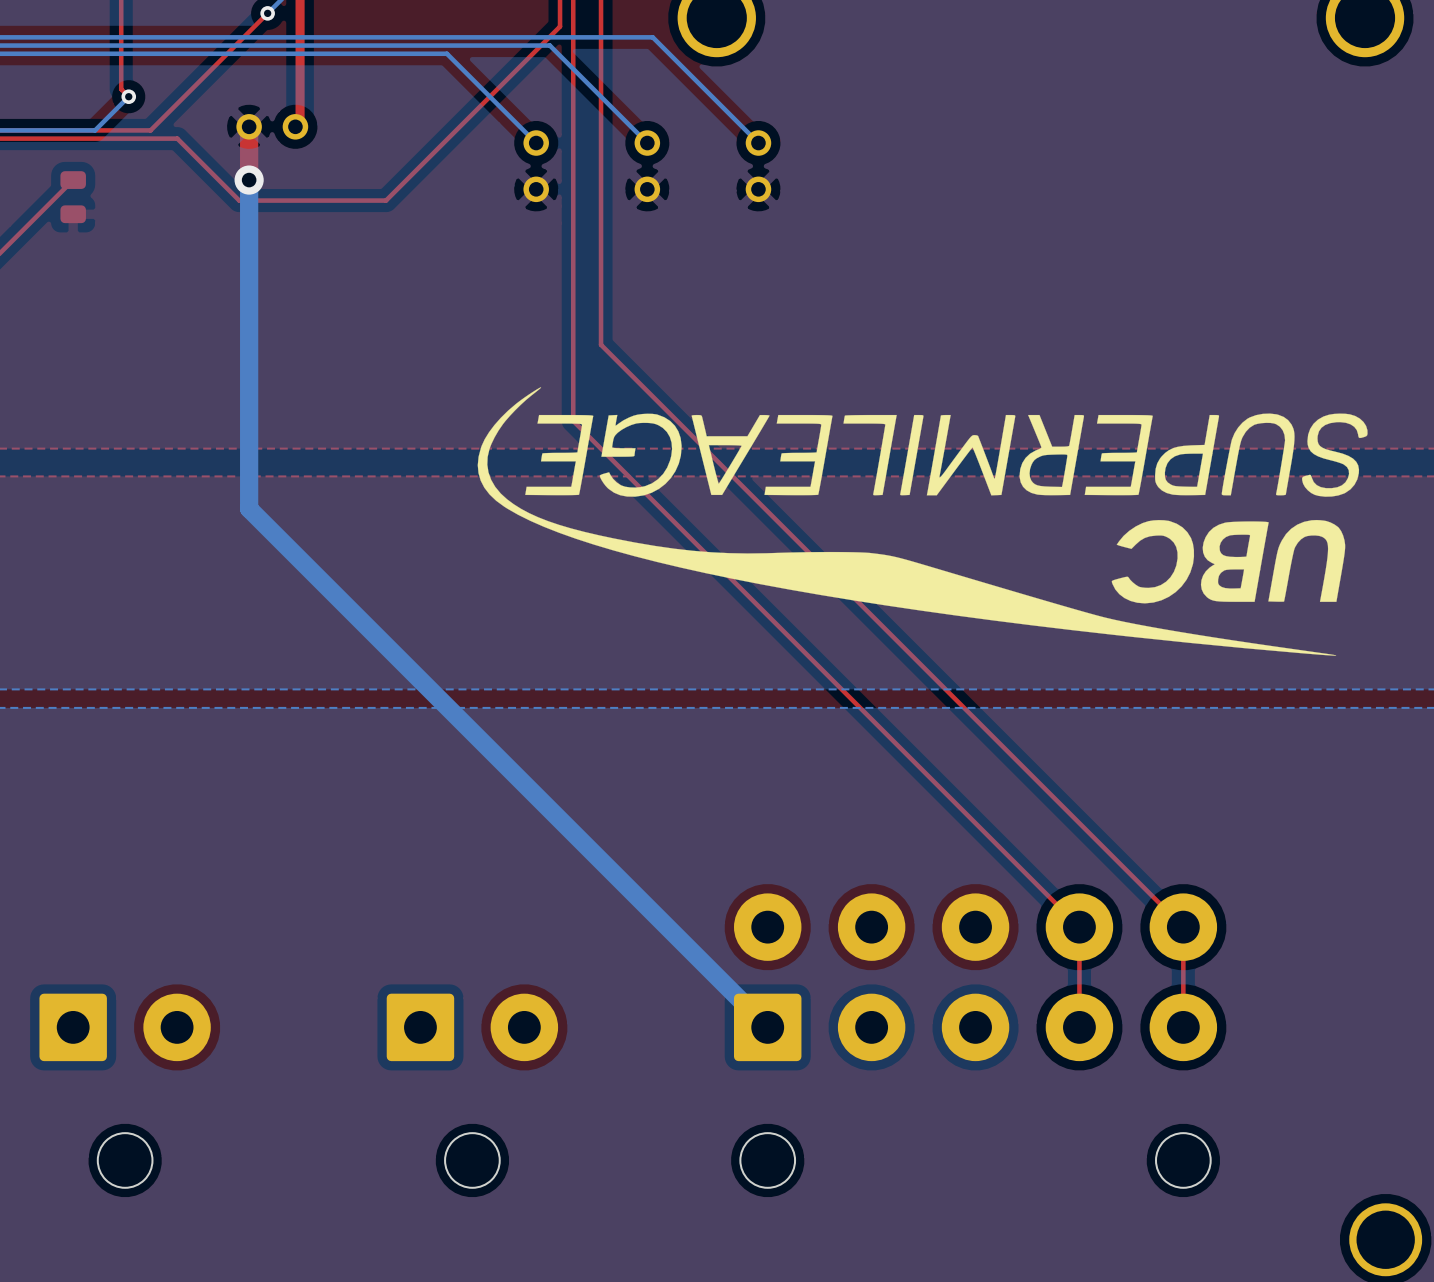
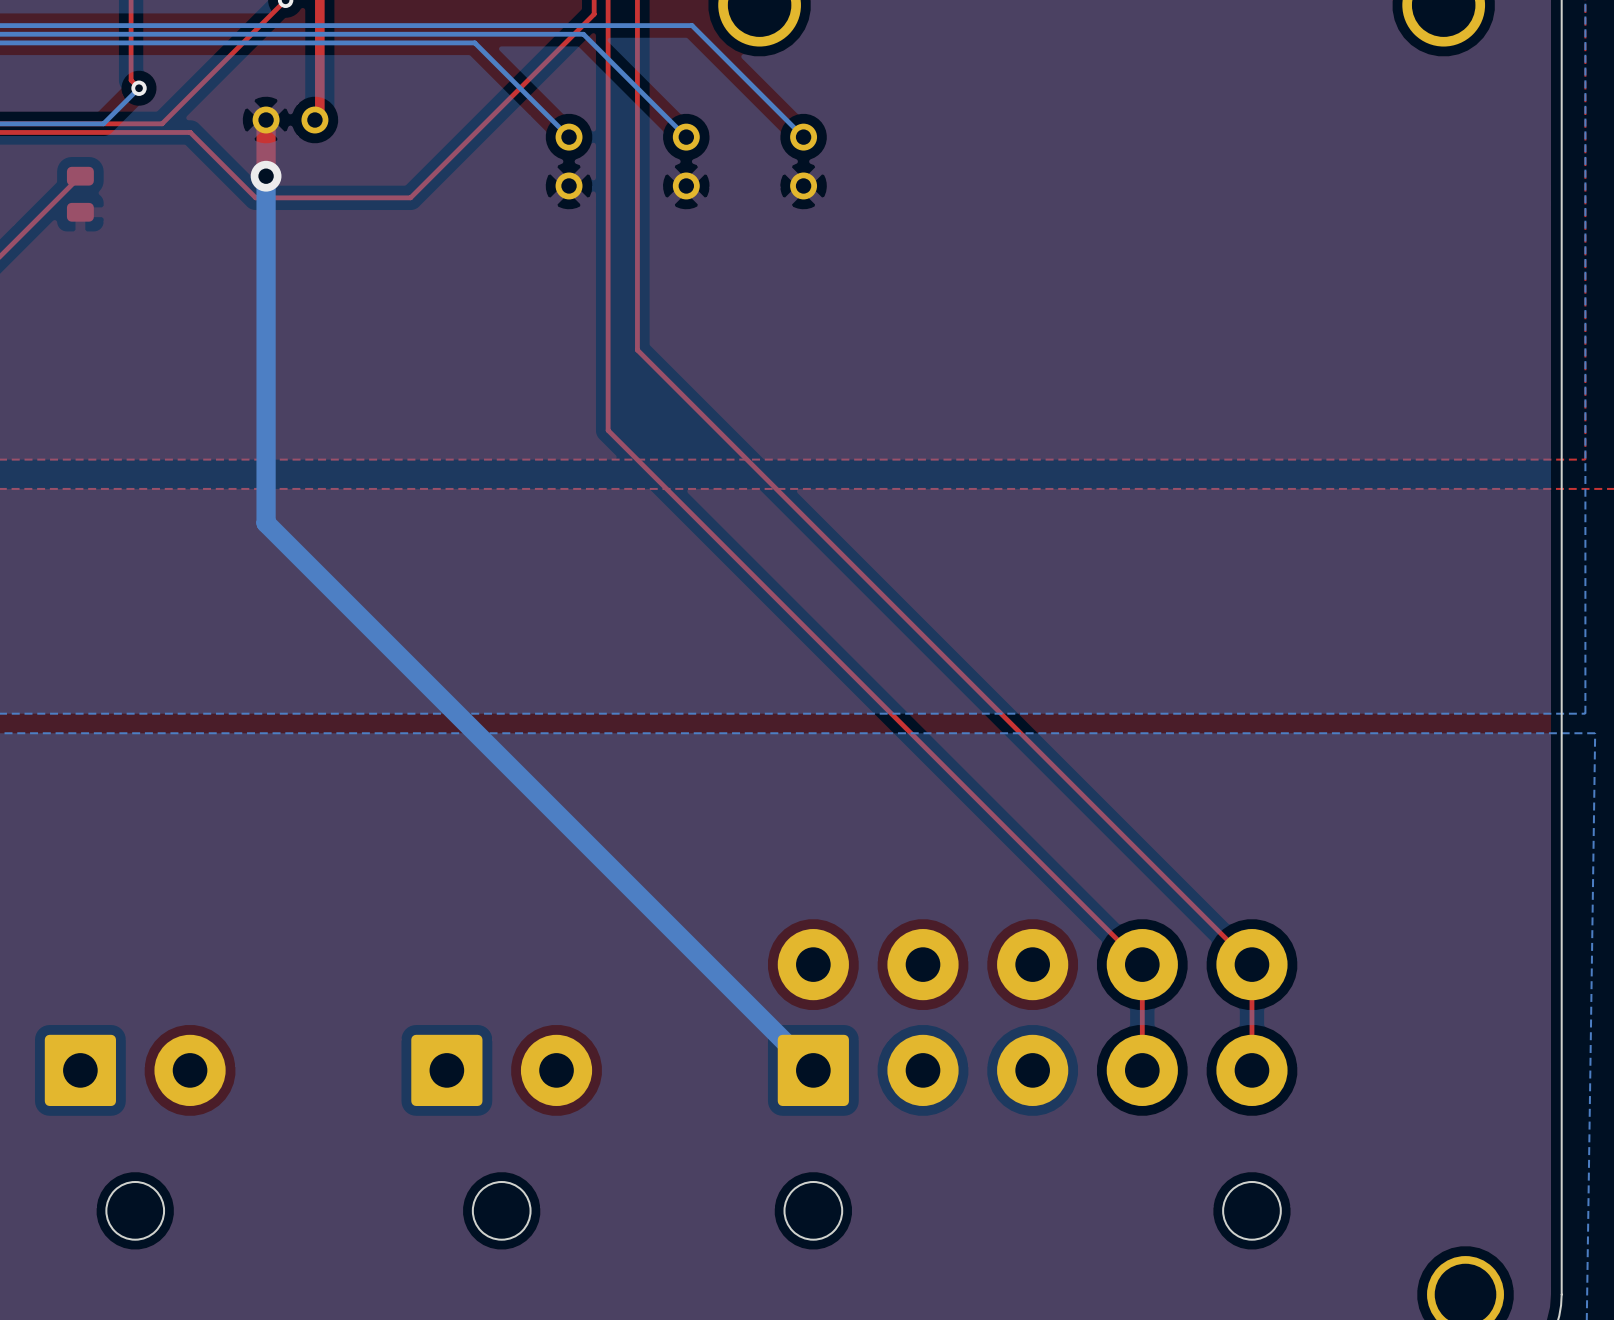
drawing: [477, 387, 1368, 656] -> none

